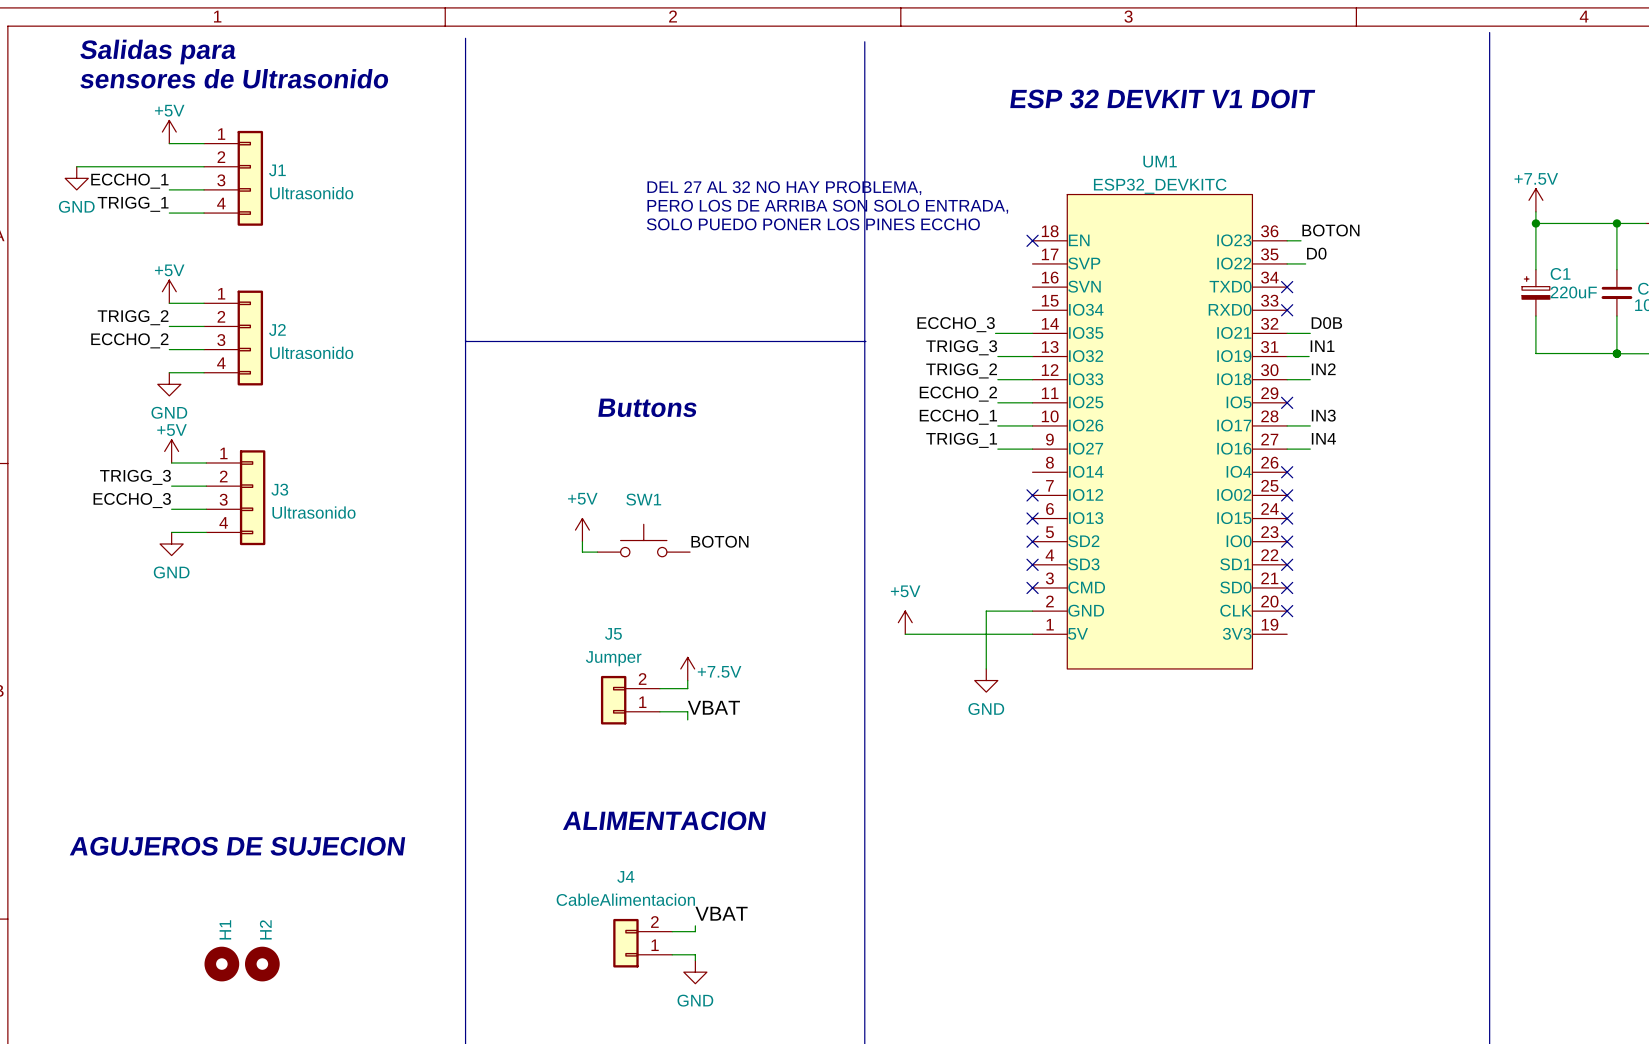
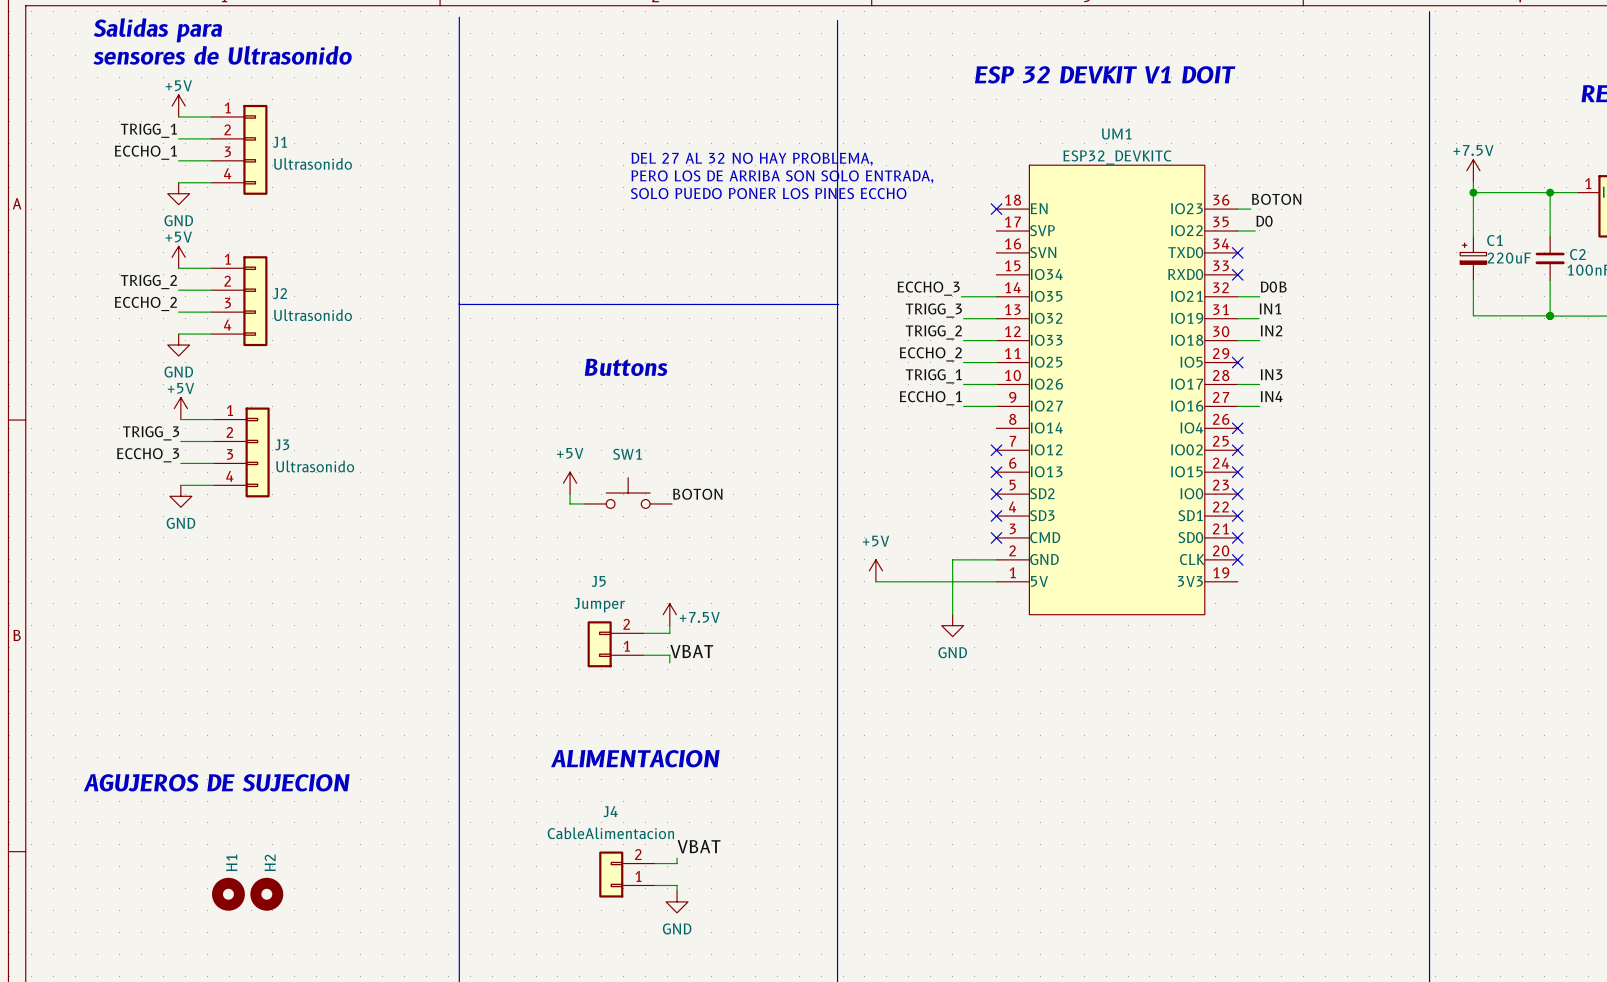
wire: (76, 166) (169, 166) -> none
power symbol position: GND (76, 178) -> GND (178, 193)
label position: TRIGG_1 (133, 204) -> TRIGG_1 (148, 130)
label: ECCHO_1 (958, 417) -> TRIGG_1 (933, 376)
label: TRIGG_1 (961, 440) -> ECCHO_1 (930, 398)

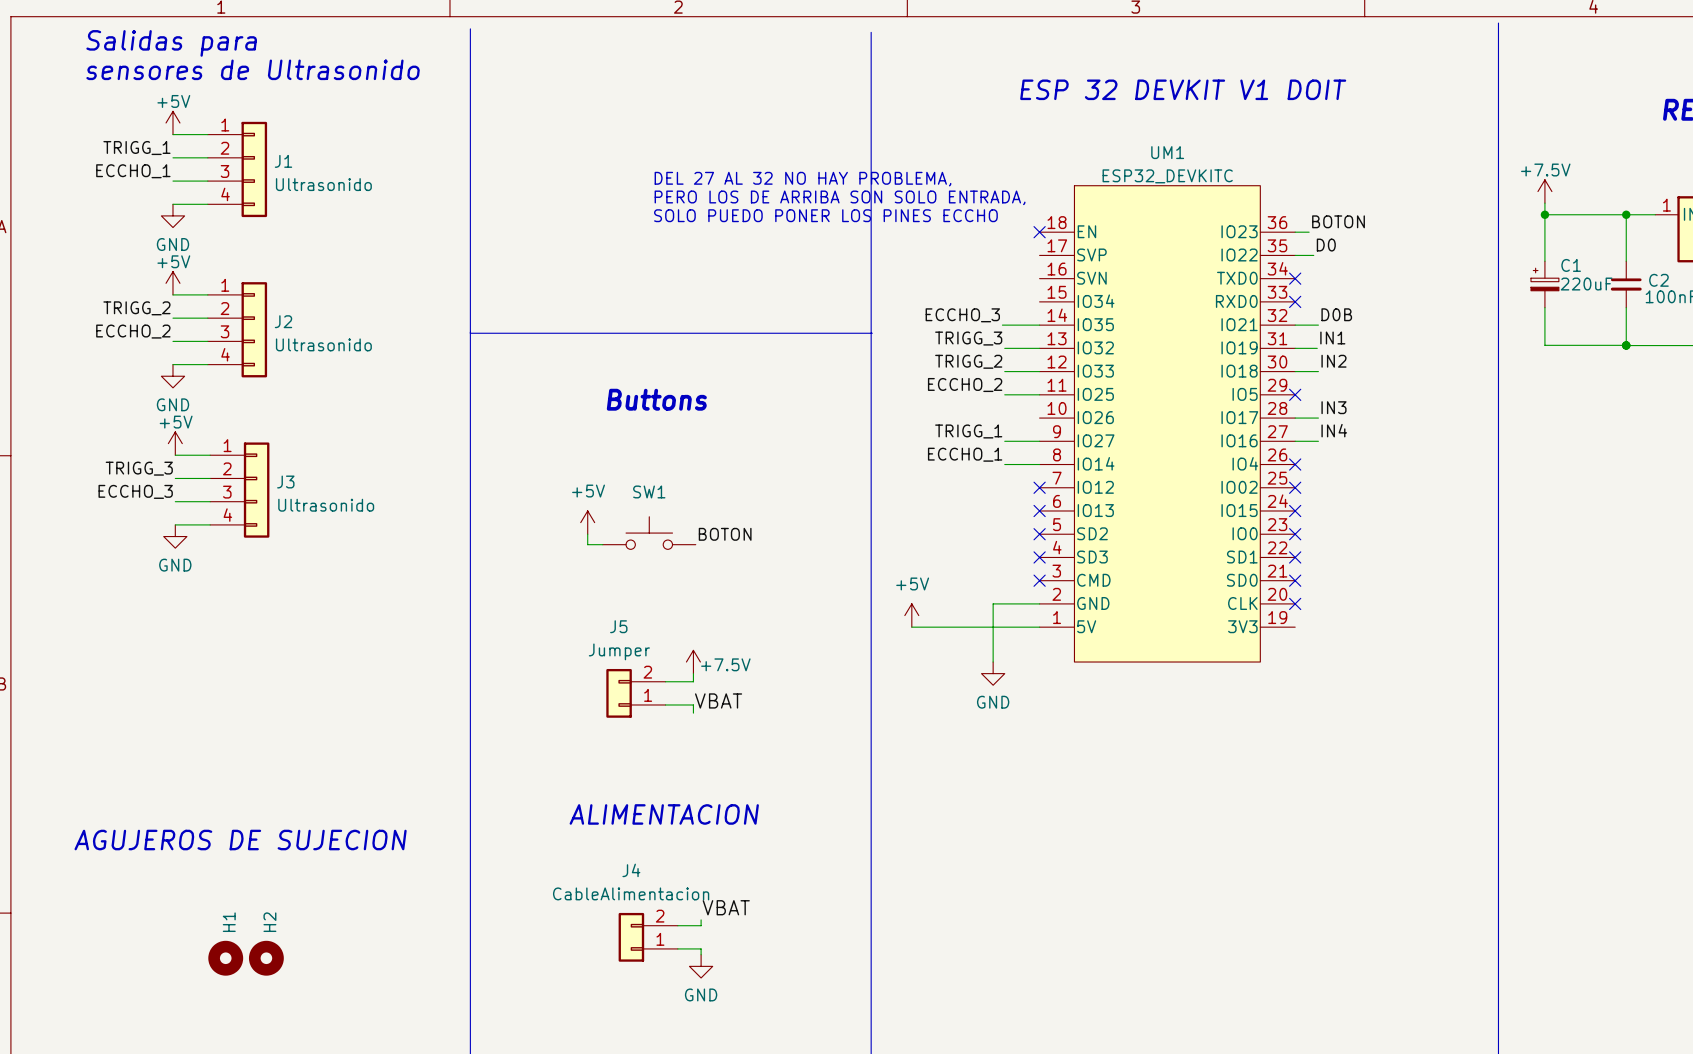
label: TRIGG_1 (933, 376) -> none
wire: (963, 384) (996, 384) -> (1004, 464) (1039, 464)
label: ECCHO_1 (930, 398) -> TRIGG_1 (968, 431)
label: none -> ECCHO_1 (965, 454)

